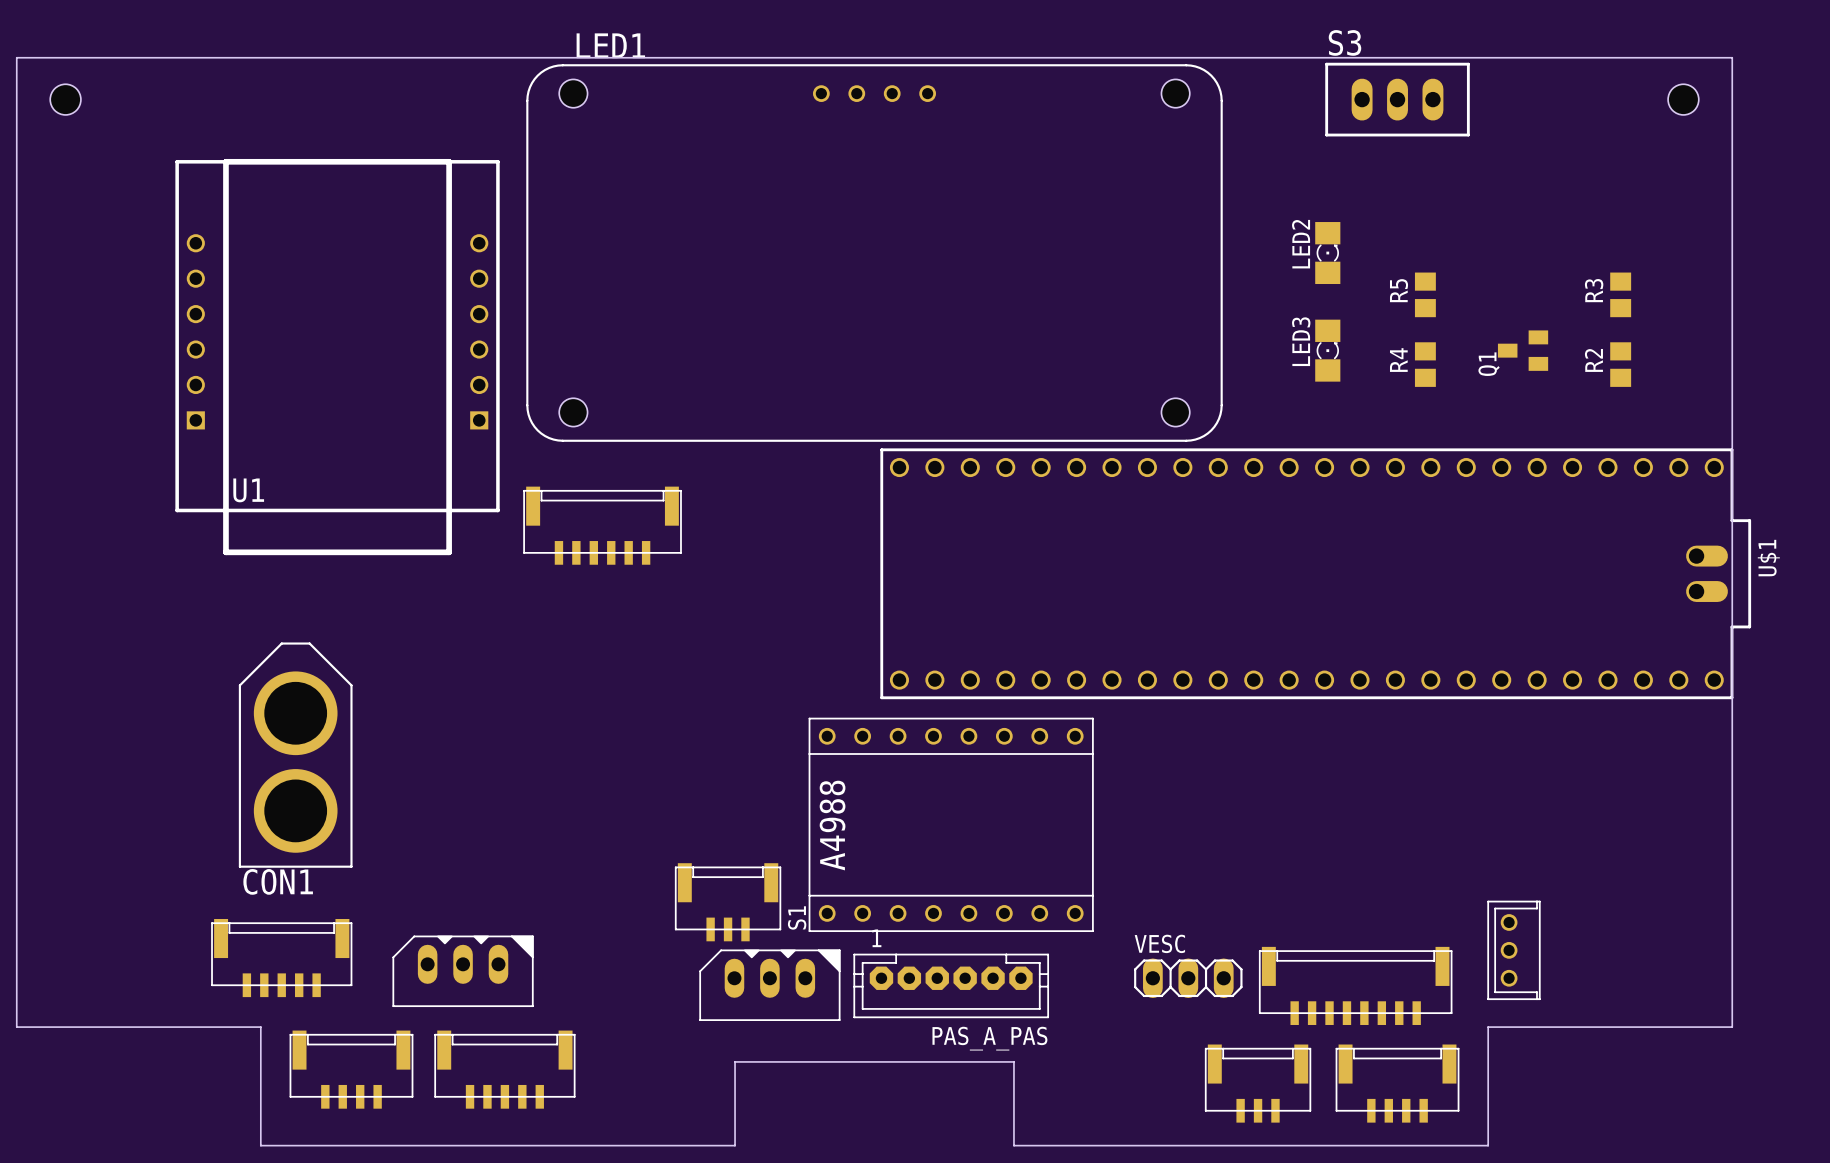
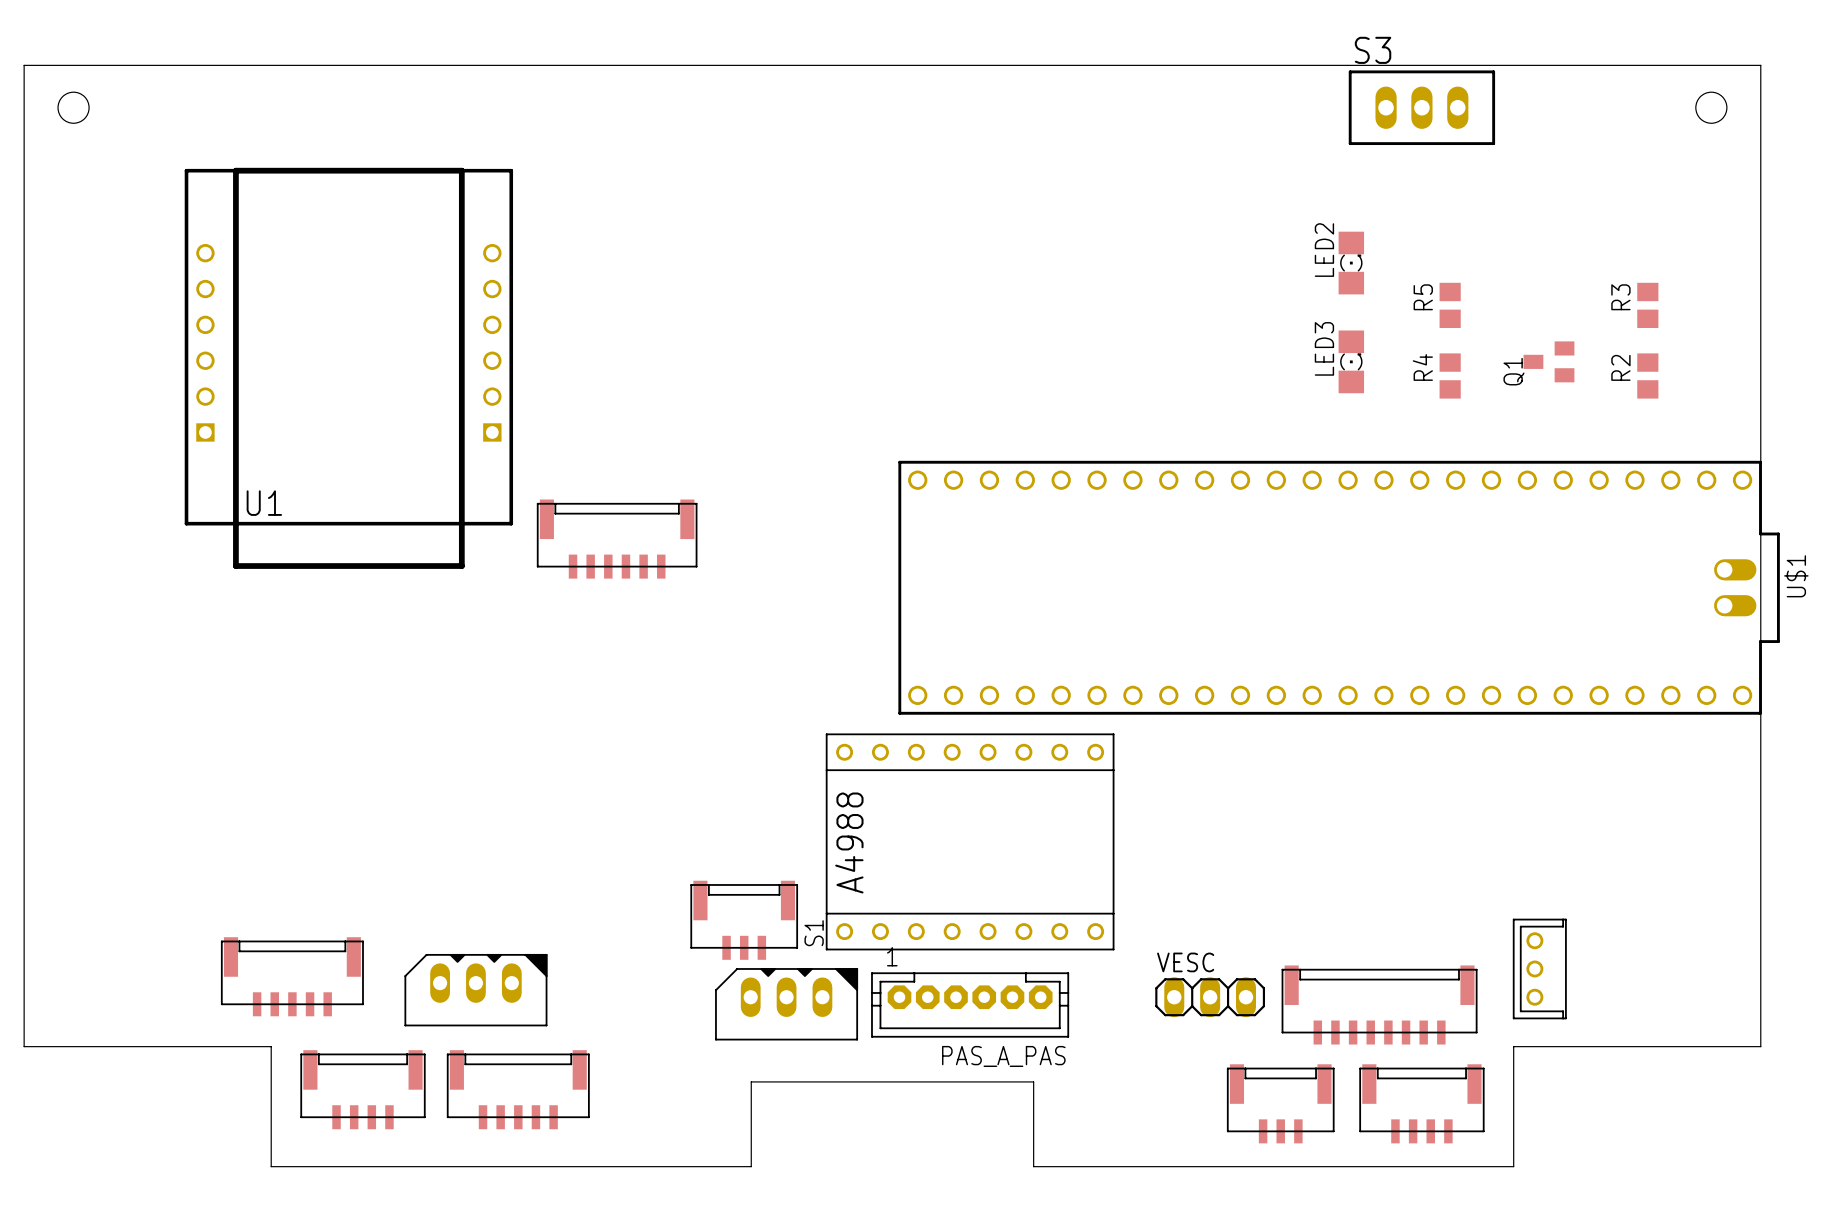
LED1: (874, 253) -> none
CON1: (295, 755) -> none

